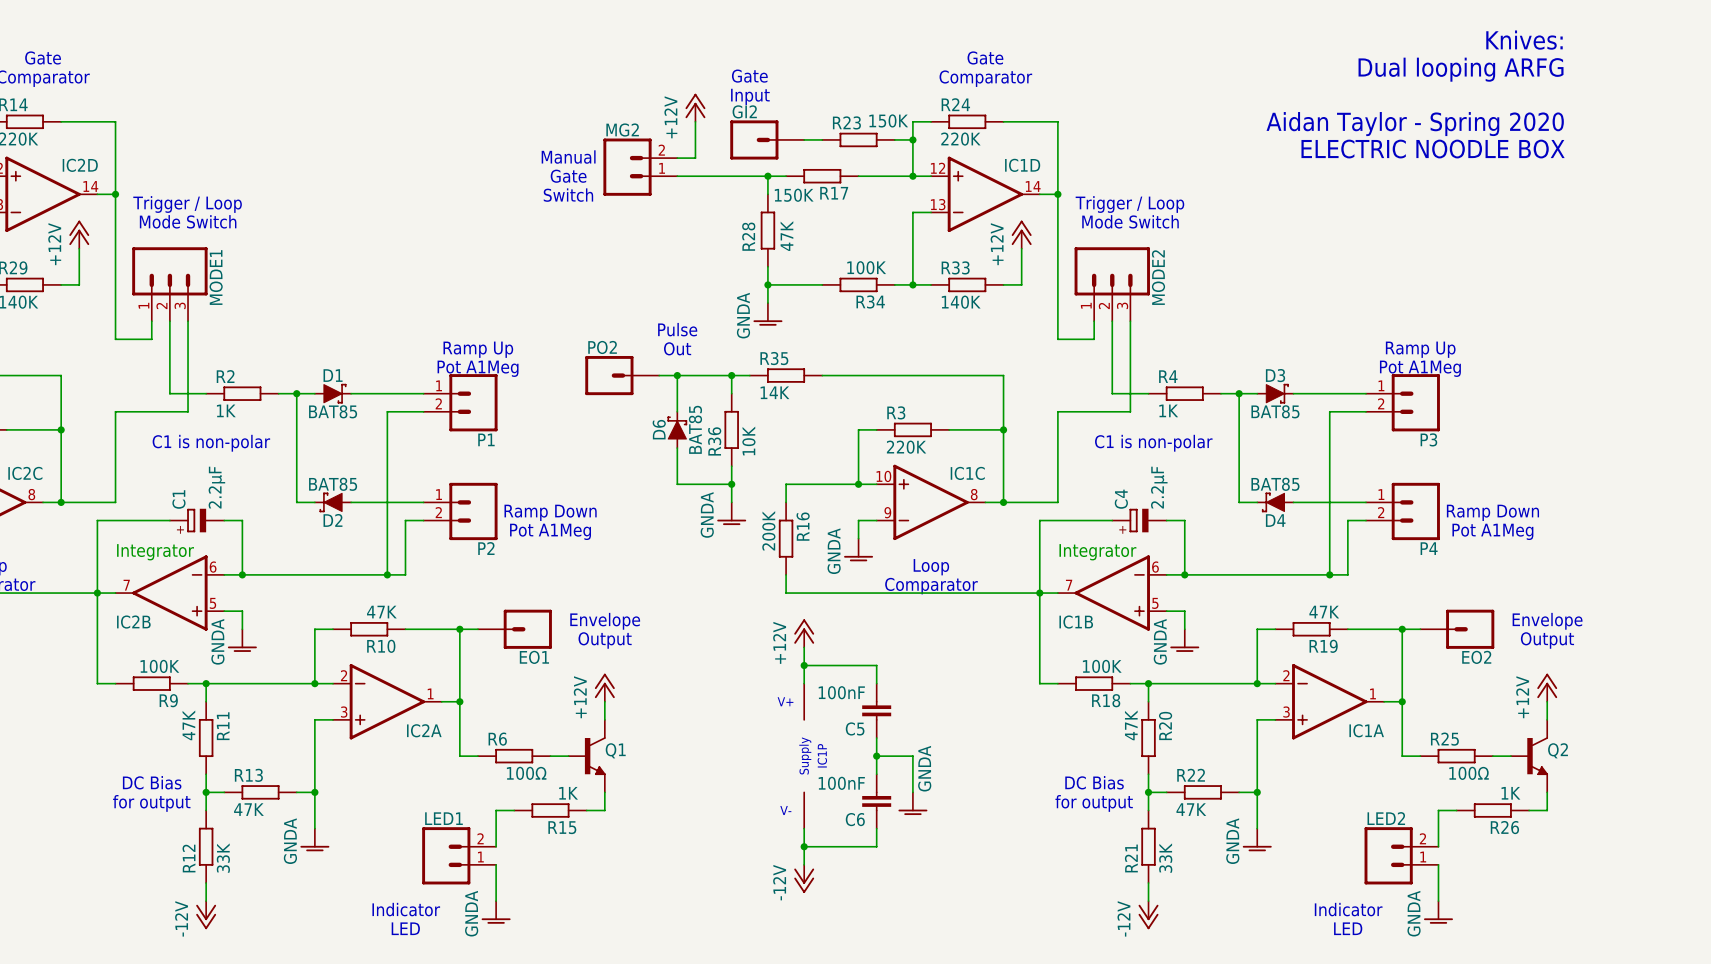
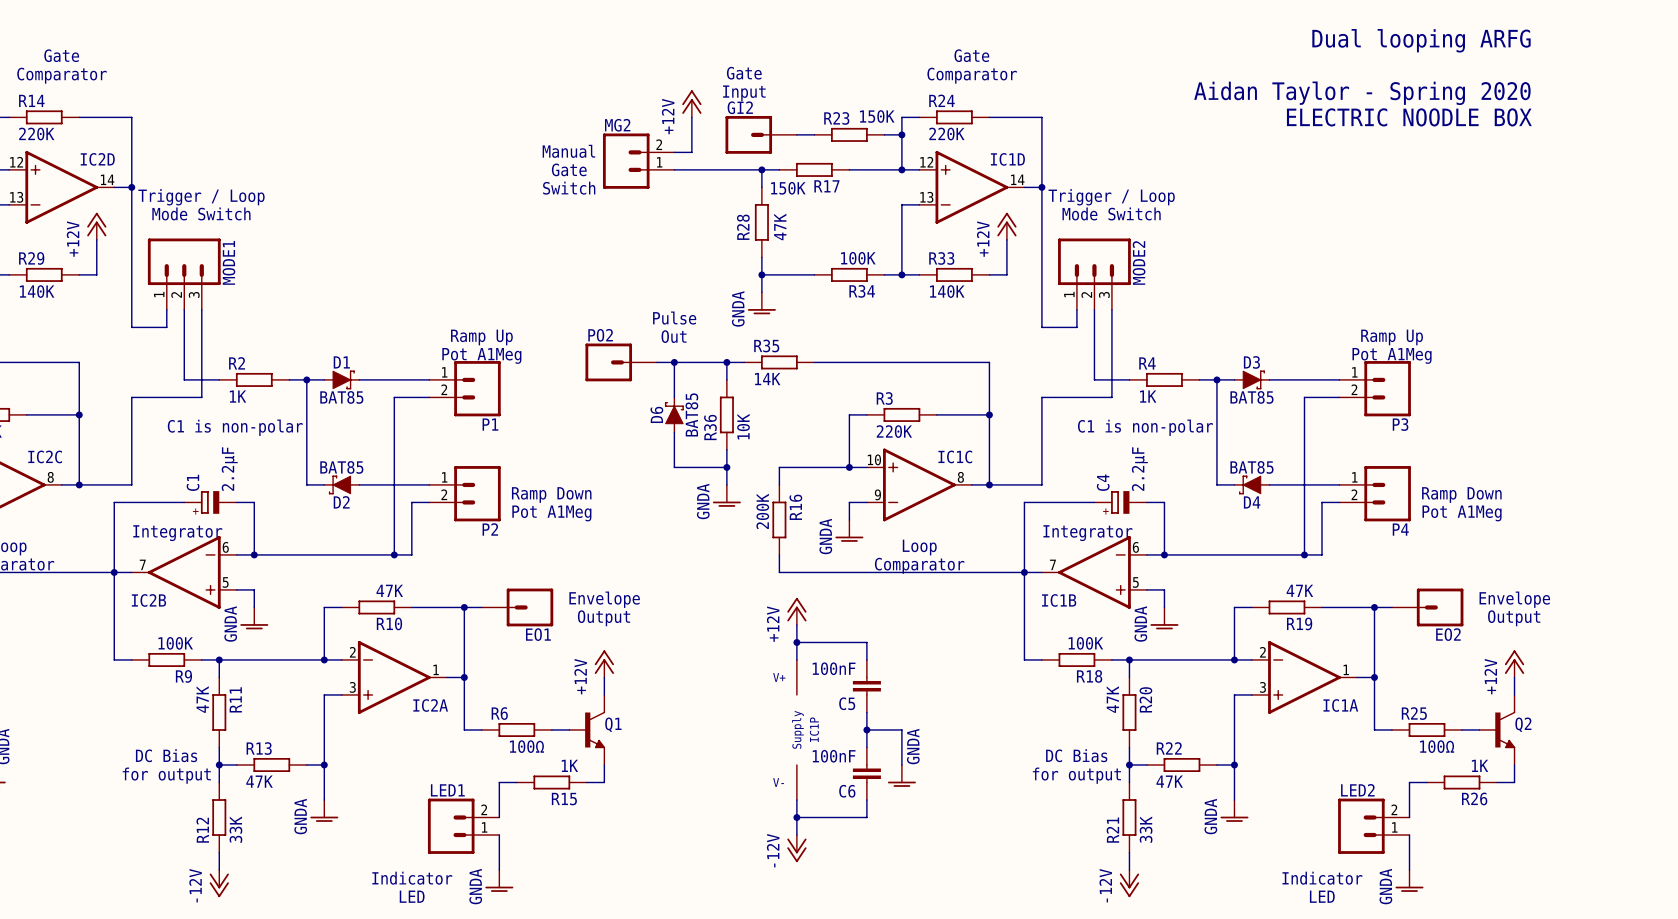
text: Knives: (1524, 40) -> Dual looping ARFG (1421, 40)
text: Dual looping ARFG (1461, 69) -> none
text: none -> Aidan Taylor - Spring 2020 (1362, 93)
text: Aidan Taylor - Spring 2020 (1415, 124) -> ELECTRIC NOODLE BOX (1409, 117)
text: ELECTRIC NOODLE BOX (1433, 149) -> none

